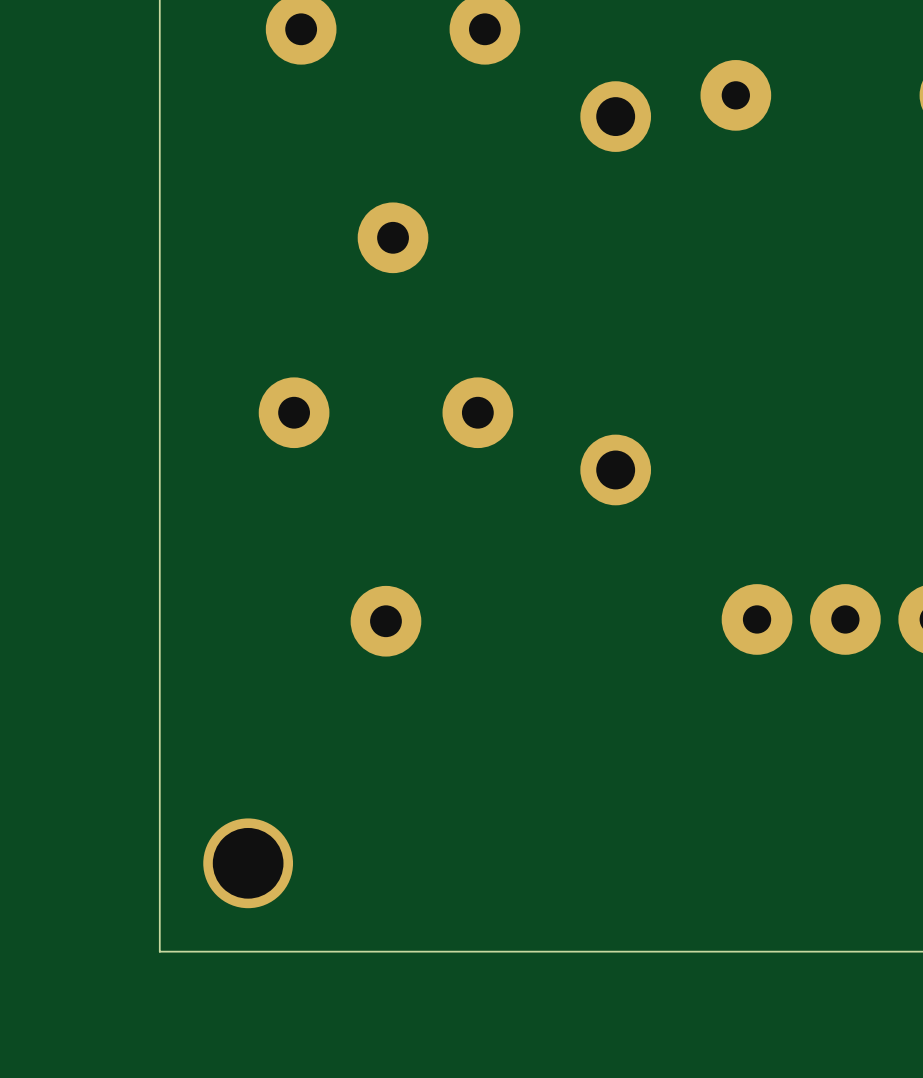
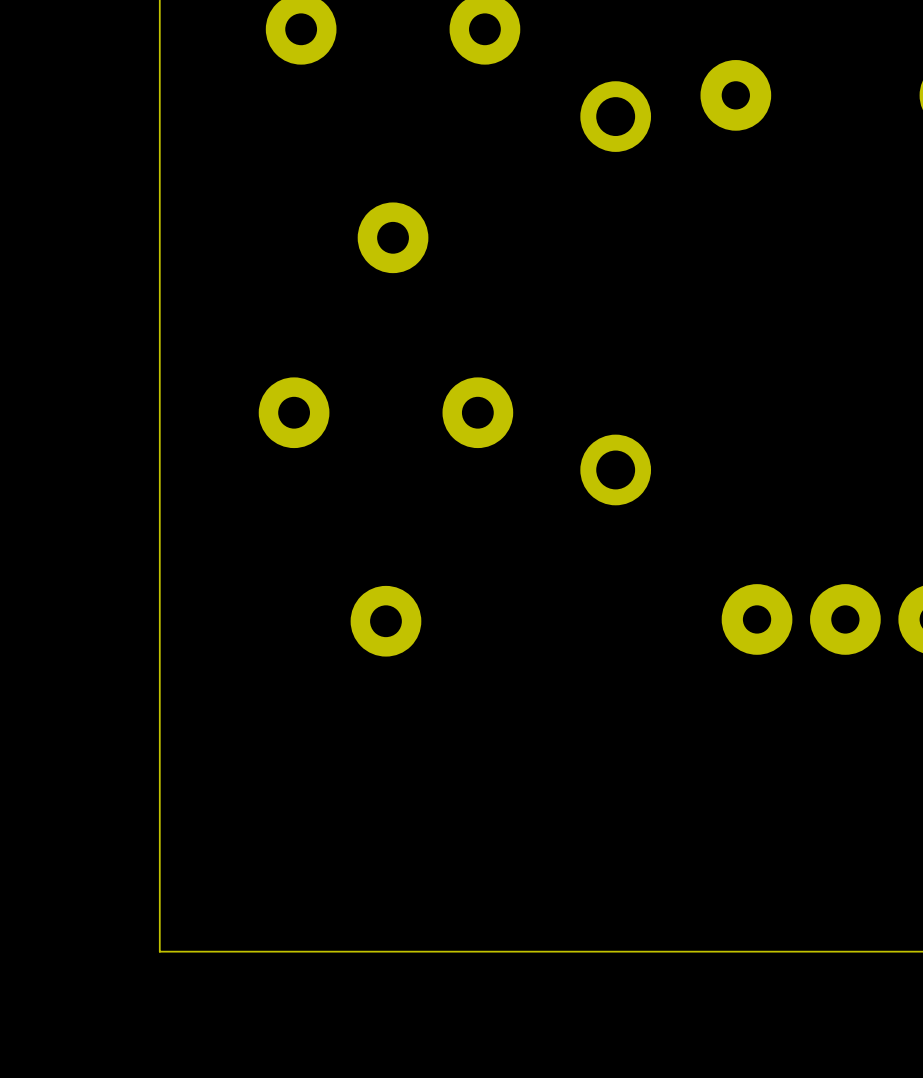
part: (248, 863) -> none

